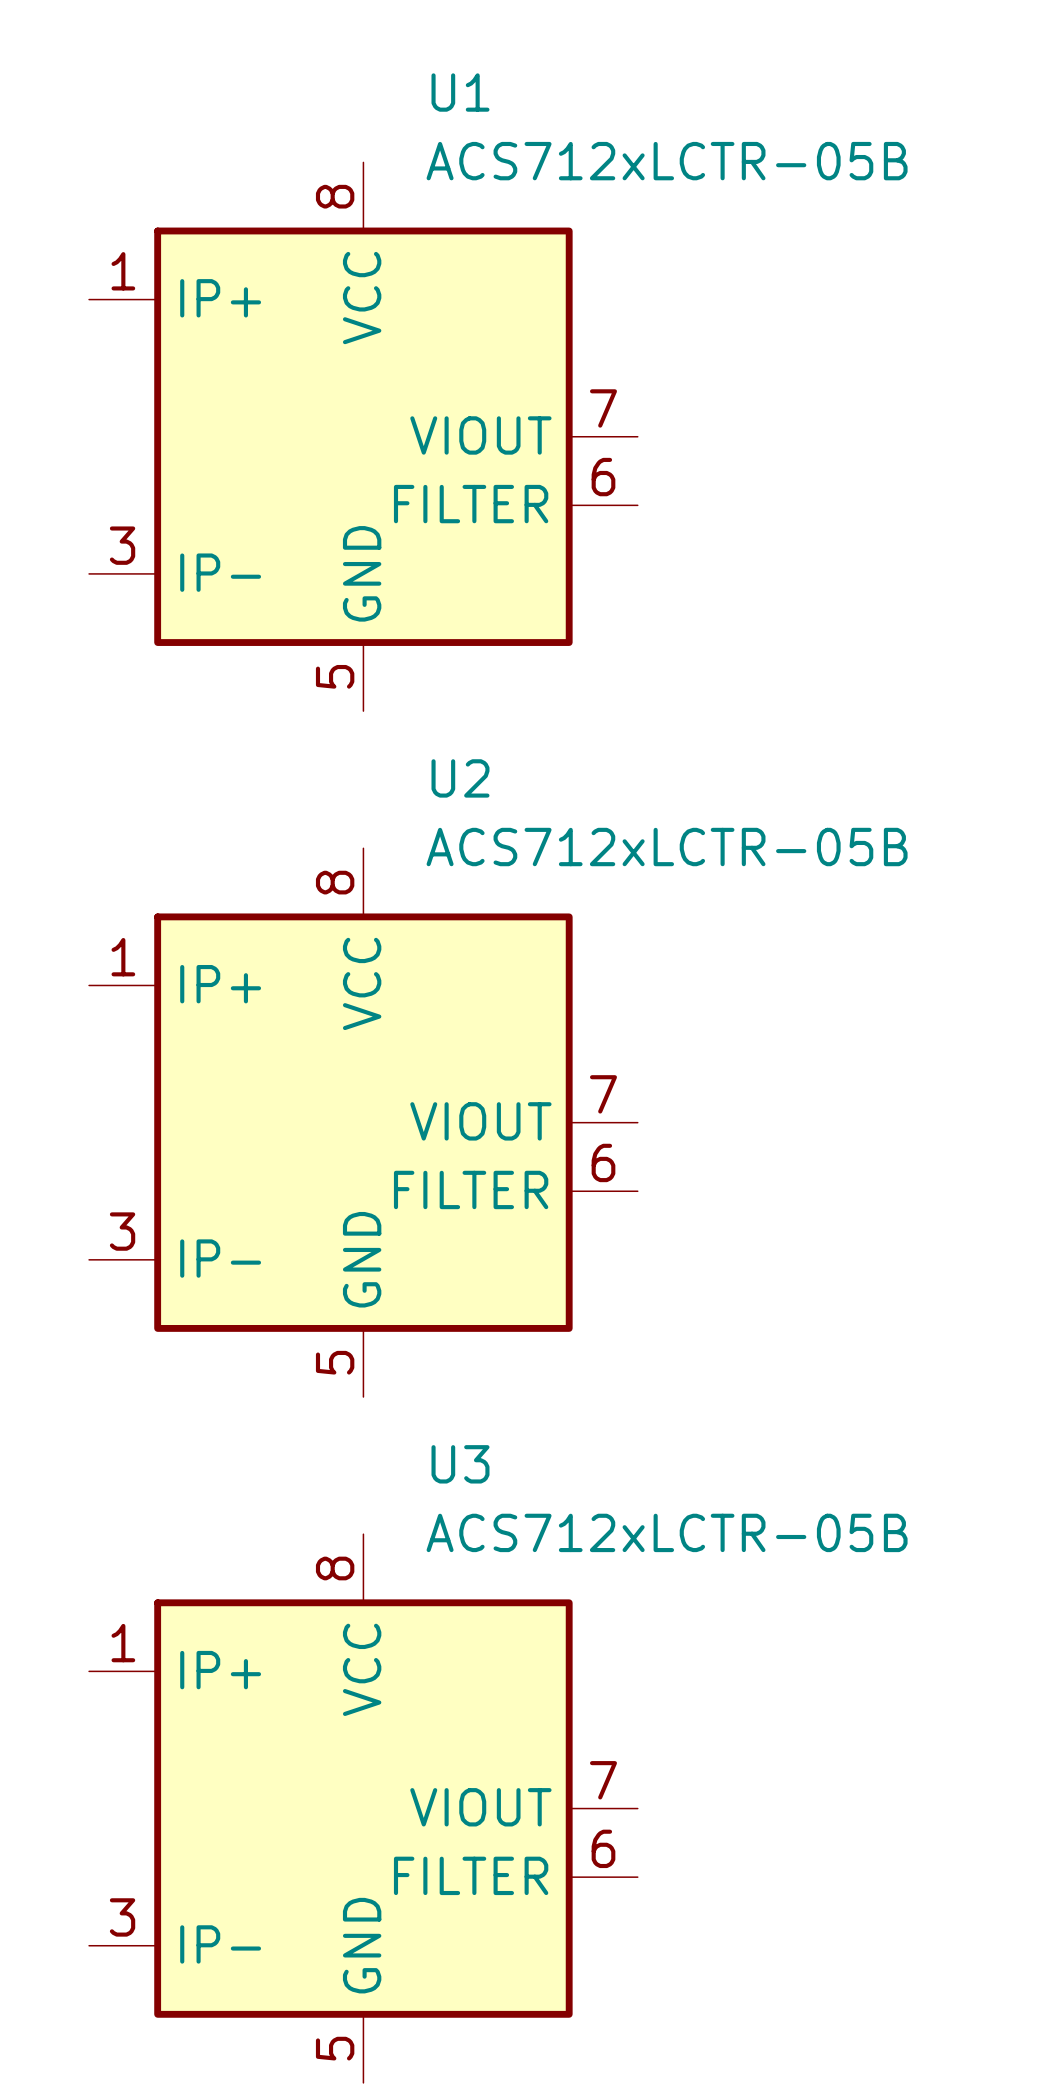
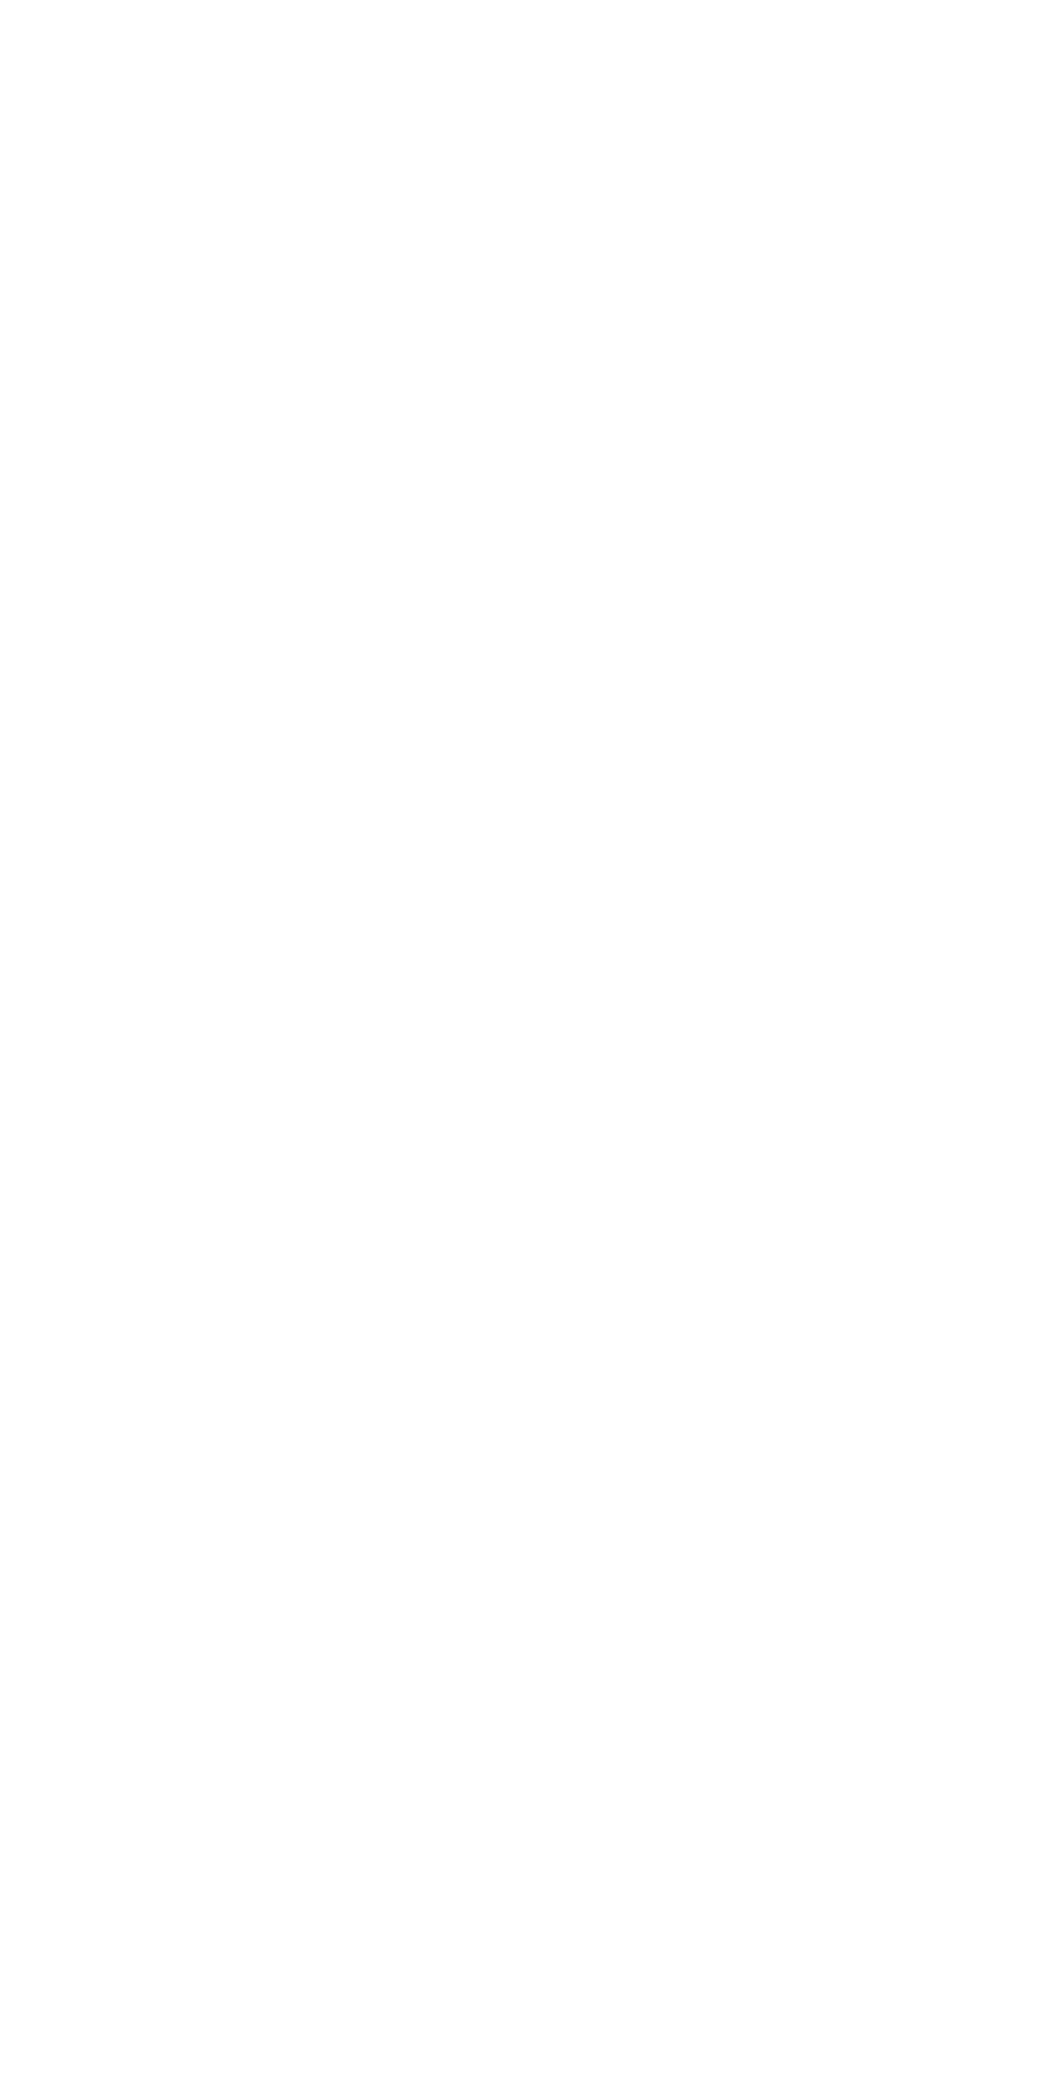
U1: ACS712xLCTR-05B (363, 436) -> none
U2: ACS712xLCTR-05B (363, 1122) -> none
U3: ACS712xLCTR-05B (363, 1808) -> none

